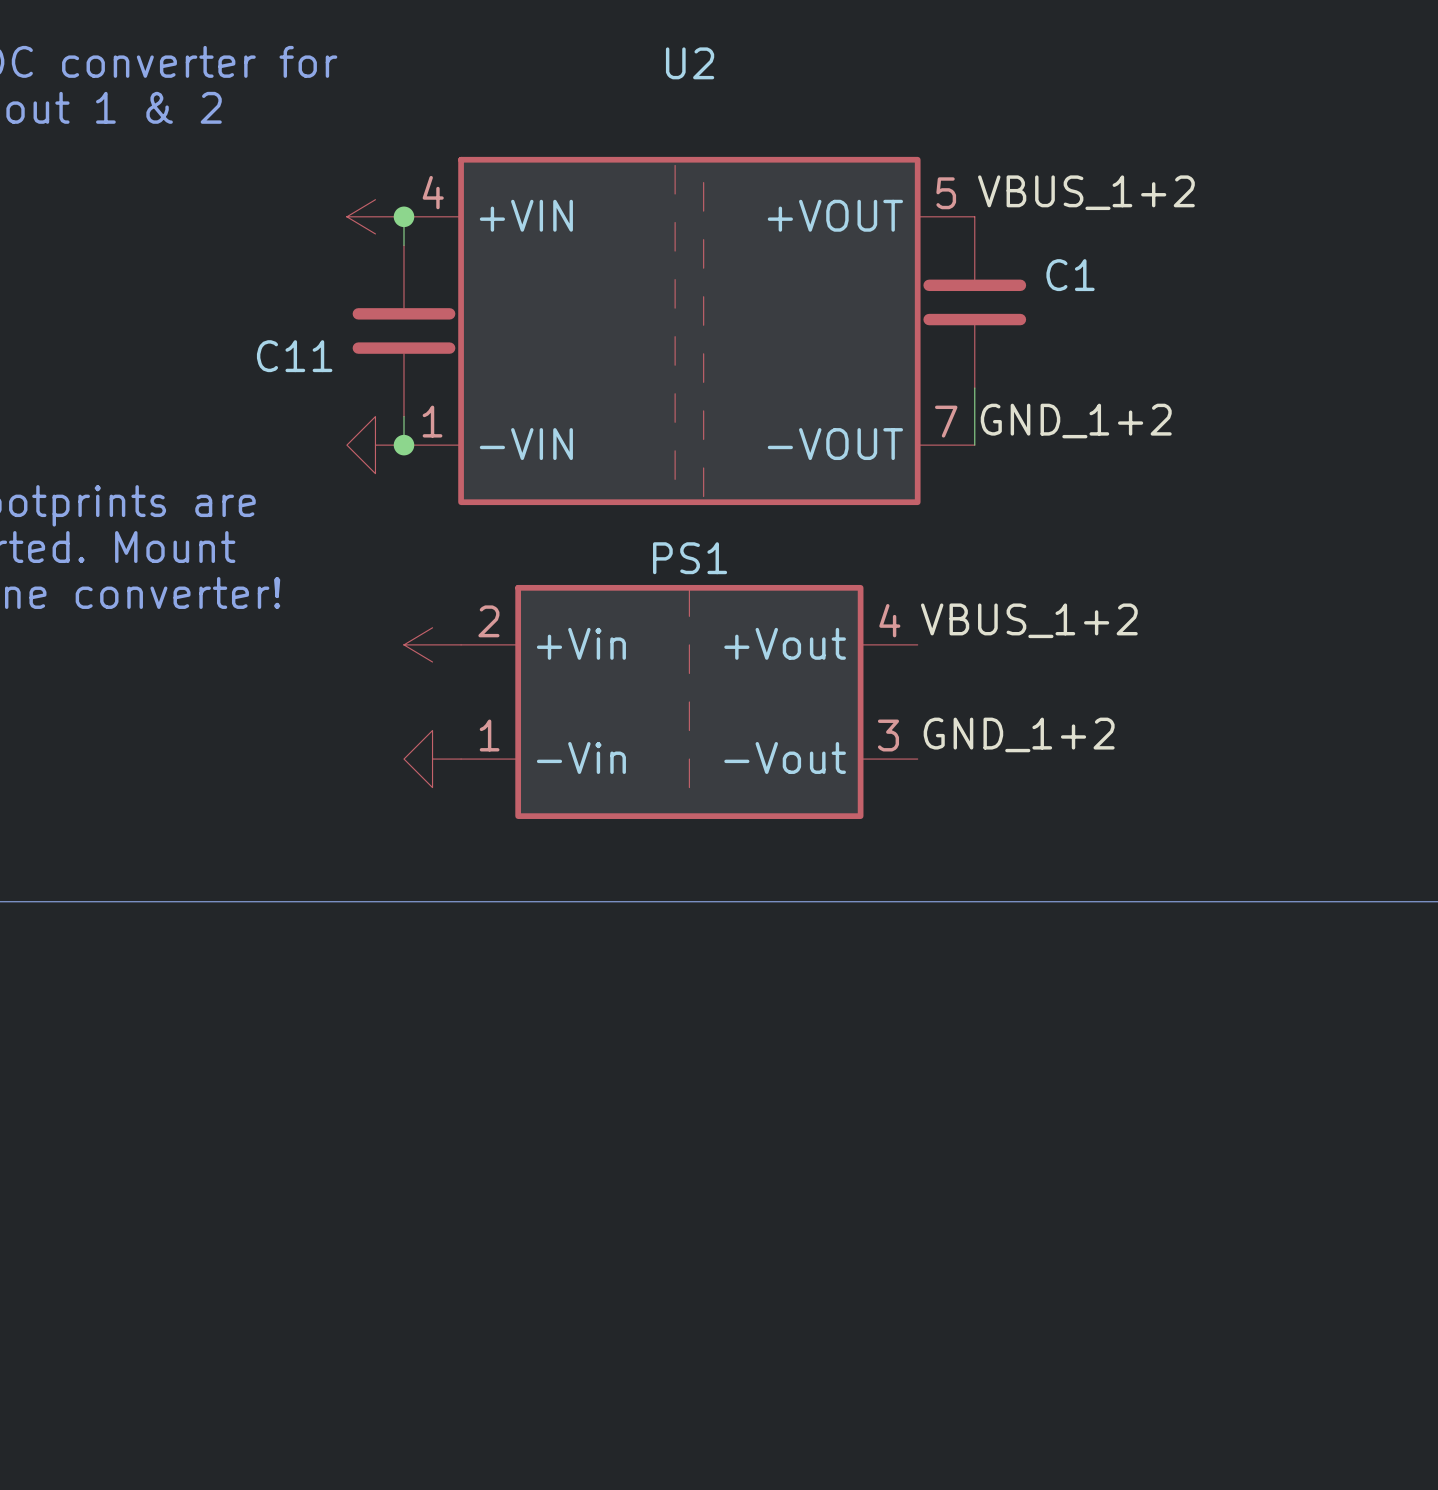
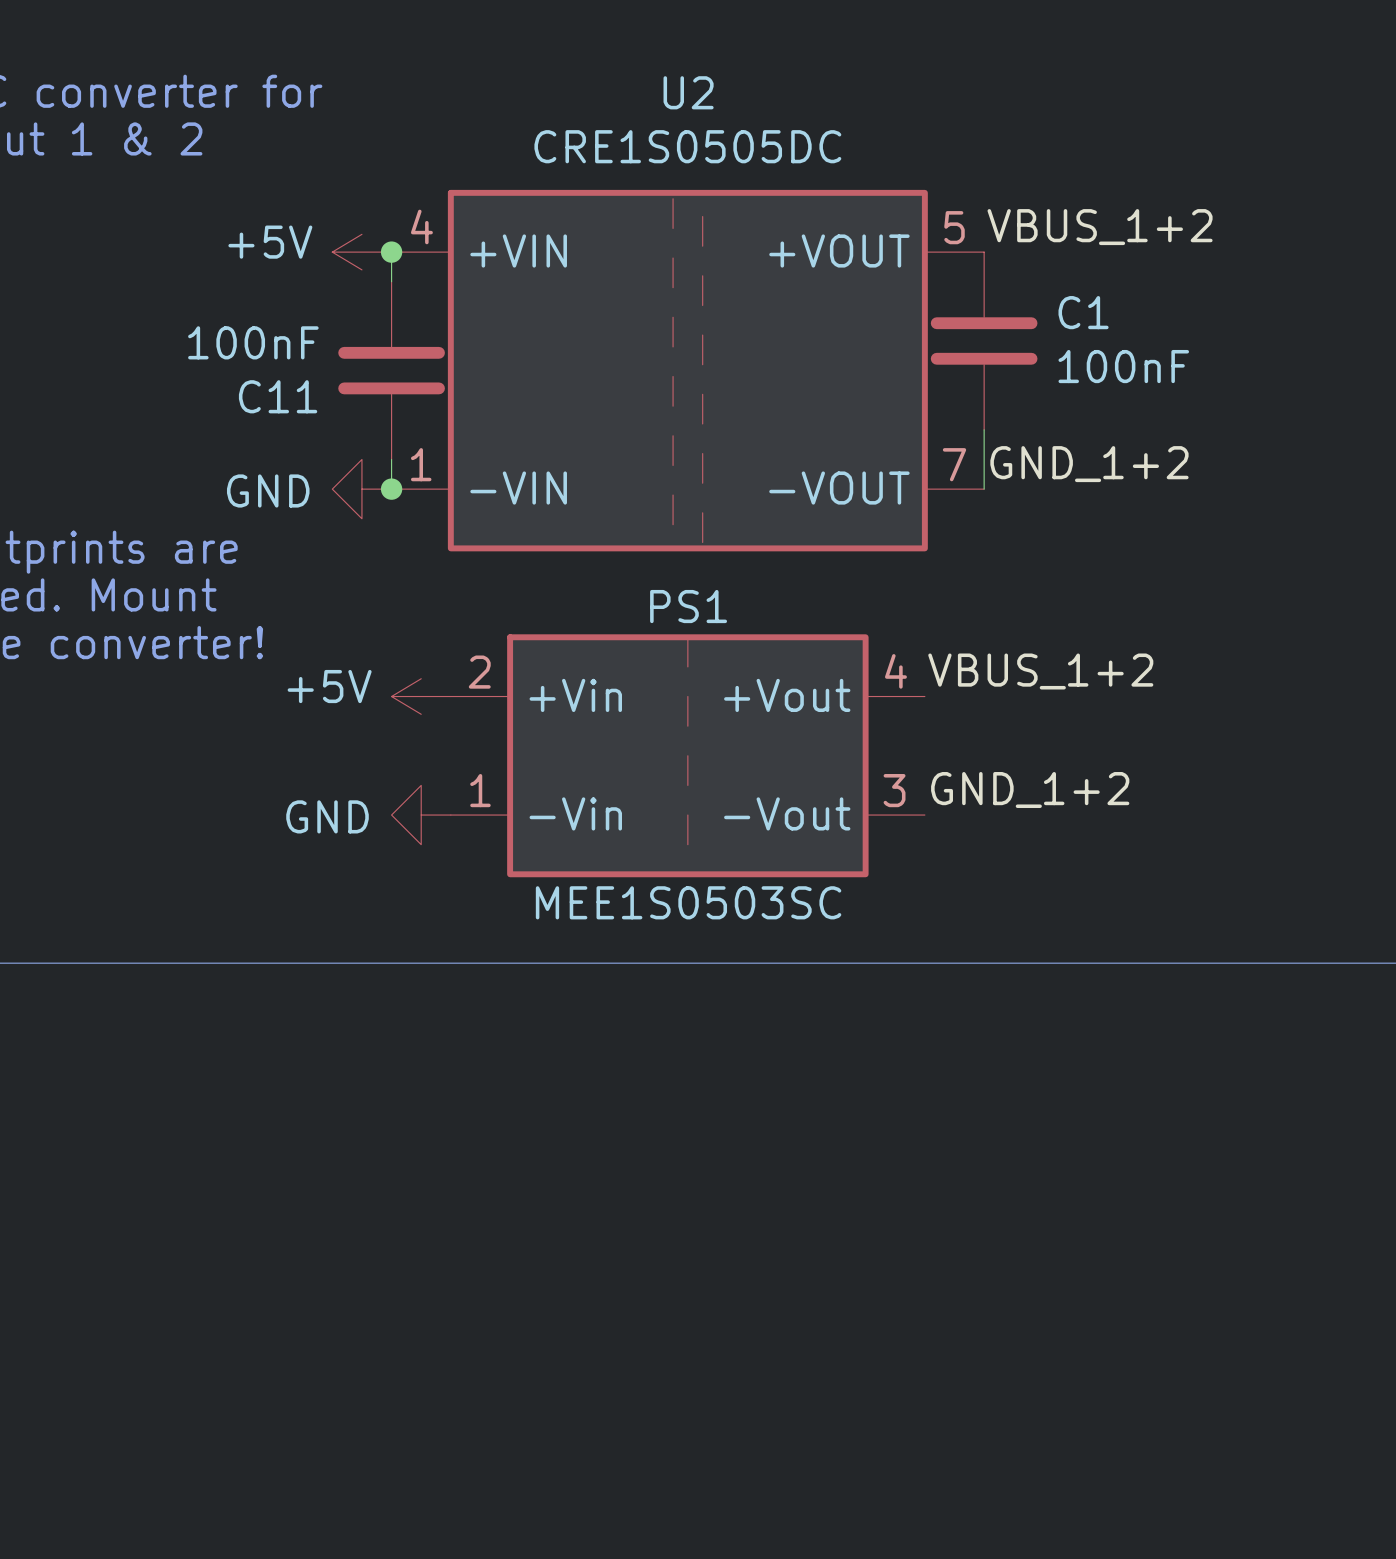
U2 value: none -> CRE1S0505DC (687, 146)
power symbol text: none -> +5V (270, 242)
C11 value: none -> 100nF (253, 342)
C1 value: none -> 100nF (1123, 366)
power symbol text: none -> GND (268, 490)
power symbol text: none -> +5V (329, 686)
power symbol text: none -> GND (327, 816)
PS1 value: none -> MEE1S0503SC (688, 902)

